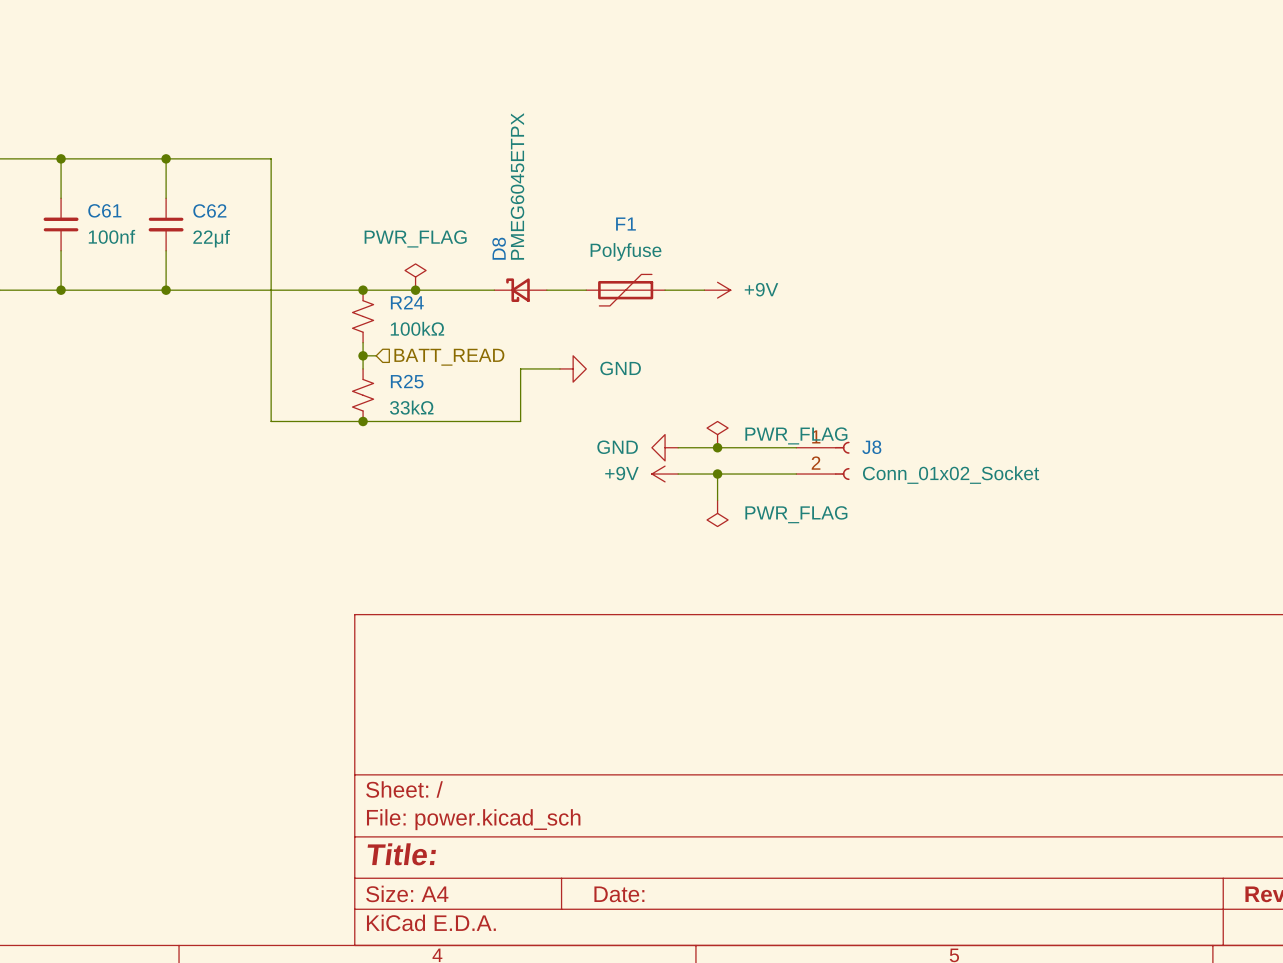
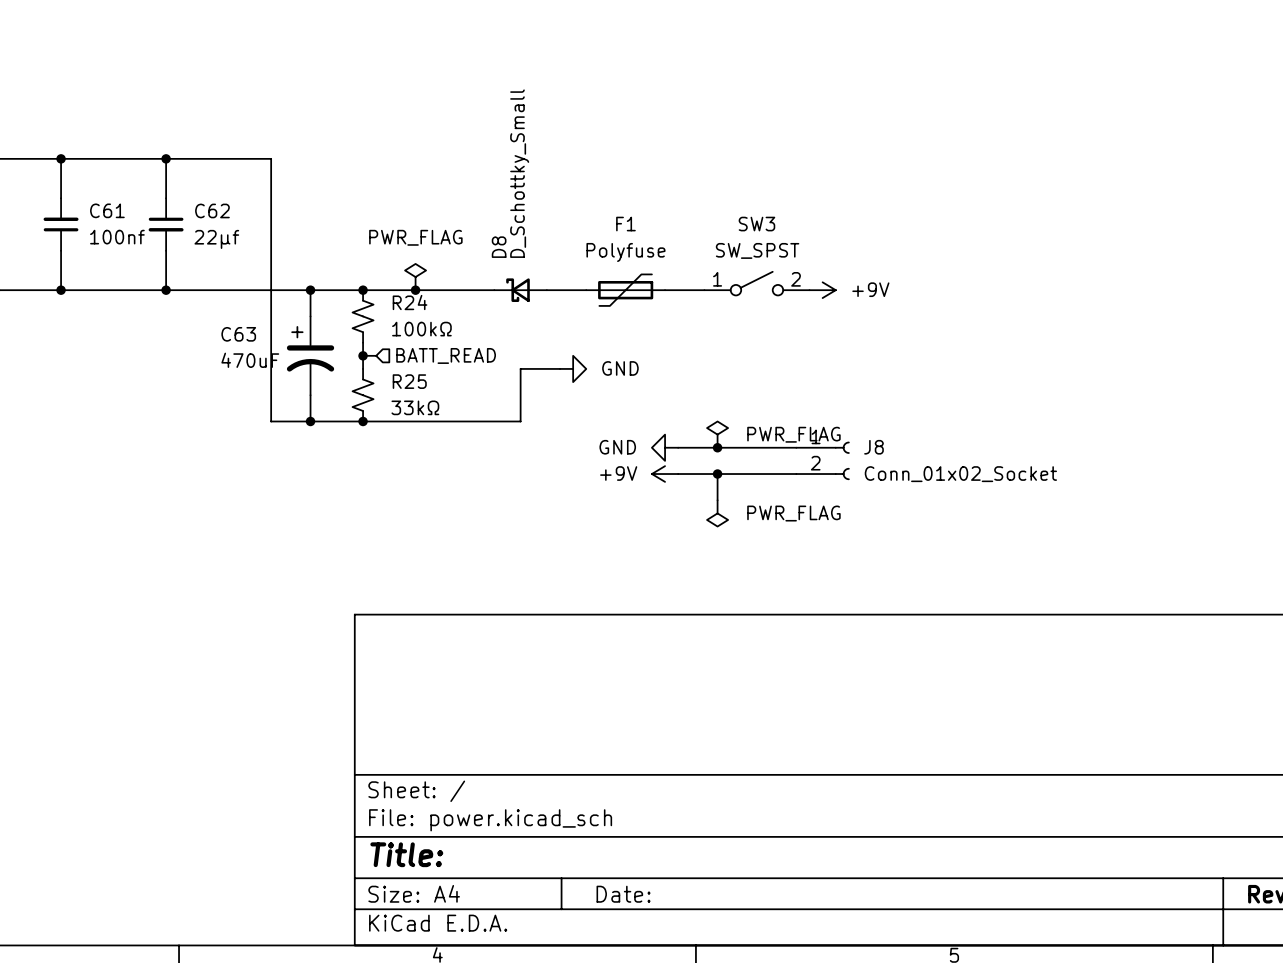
D8 value: PMEG6045ETPX (517, 186) -> D_Schottky_Small (519, 173)
SW3: none -> SW_SPST (756, 283)
wire: none -> (310, 290) (310, 316)
junction: none -> (310, 290)
power symbol position: +9V (717, 290) -> +9V (822, 290)
C63: none -> 470uF (310, 355)
wire: none -> (310, 395) (310, 421)
junction: none -> (310, 421)

